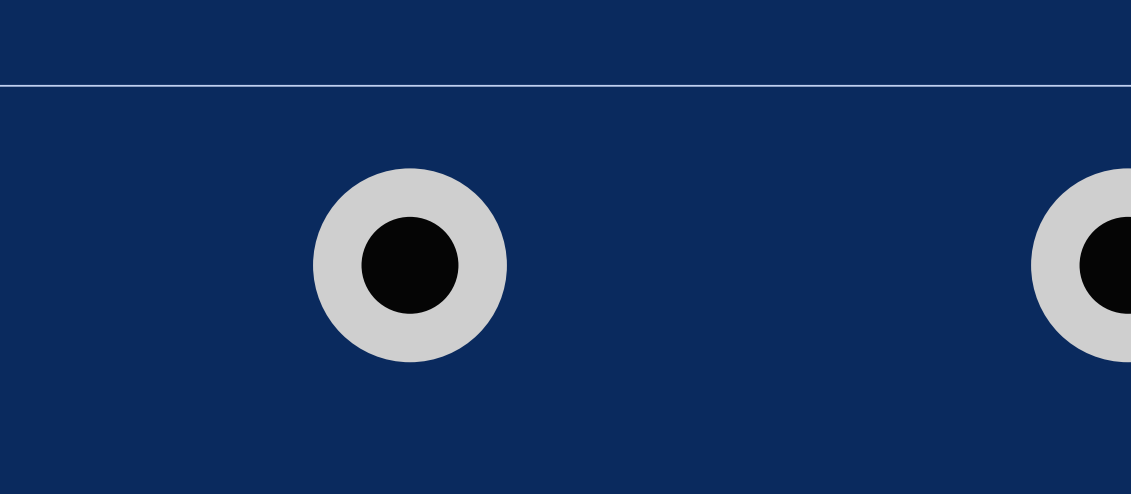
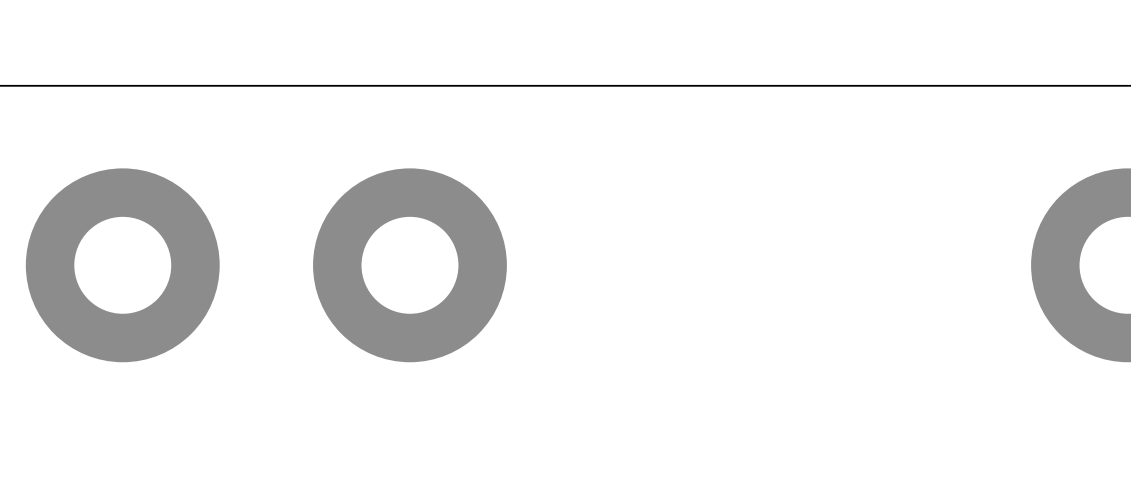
part: none -> (122, 265)

